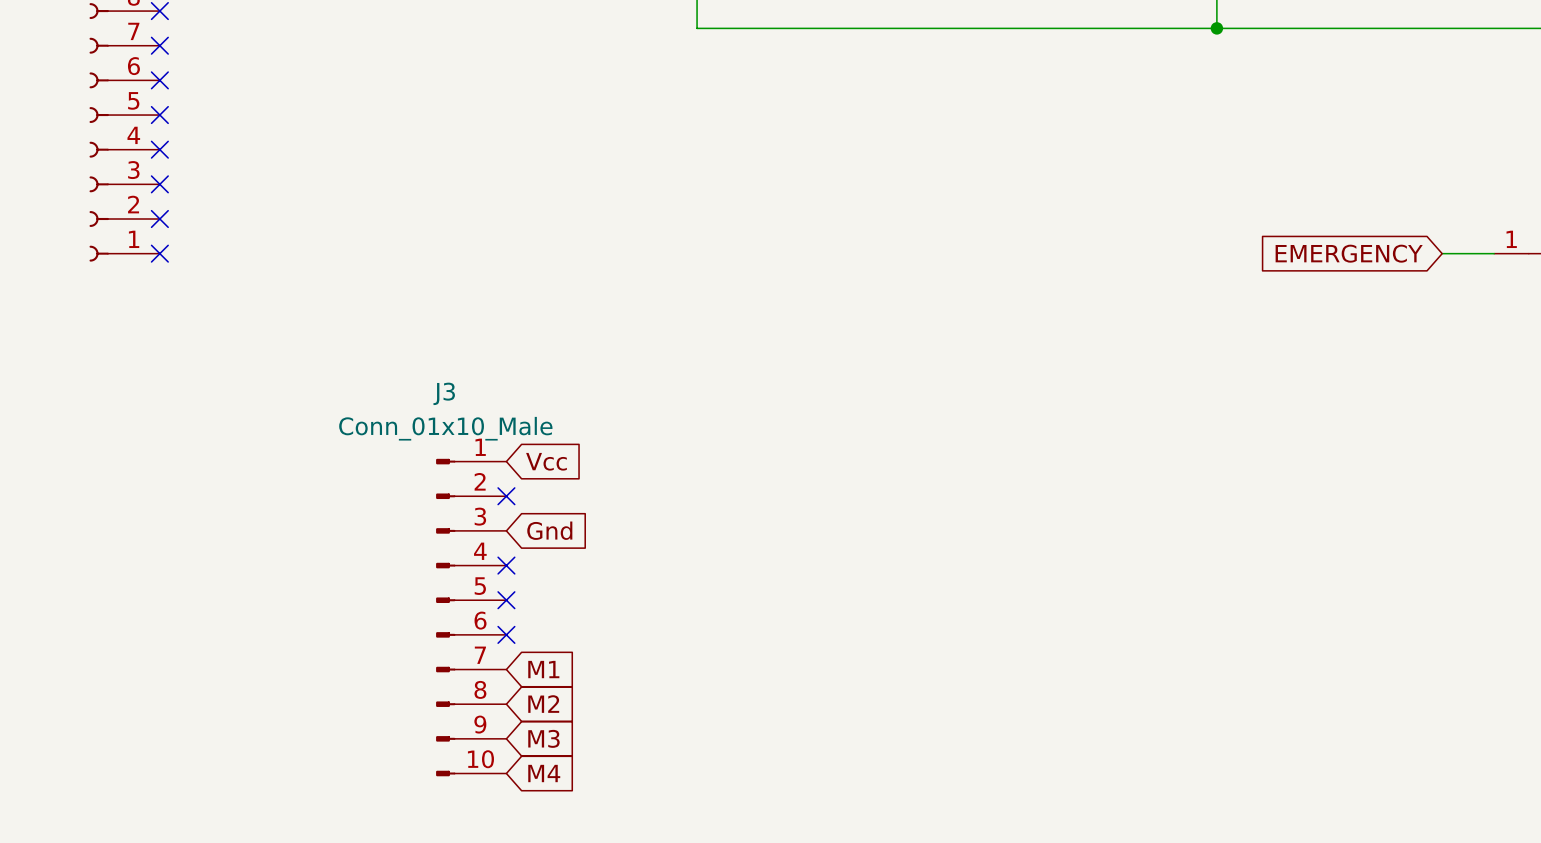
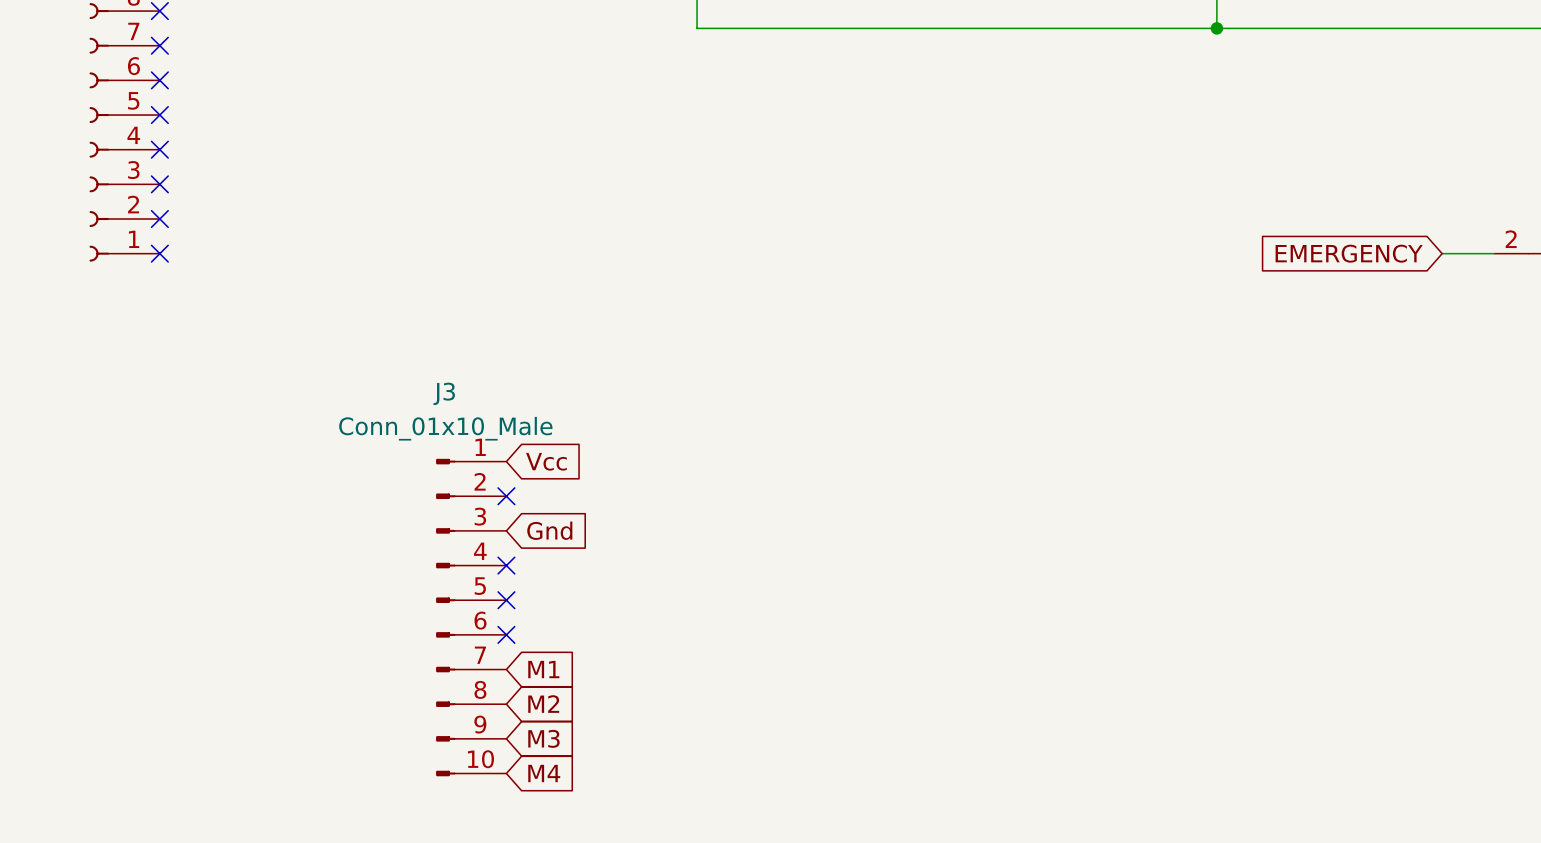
part pin number: 1 (1511, 239) -> 2 (1511, 239)

